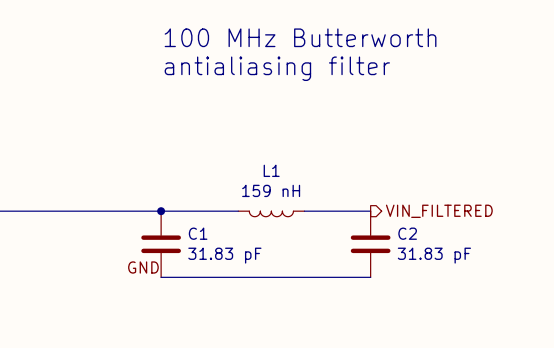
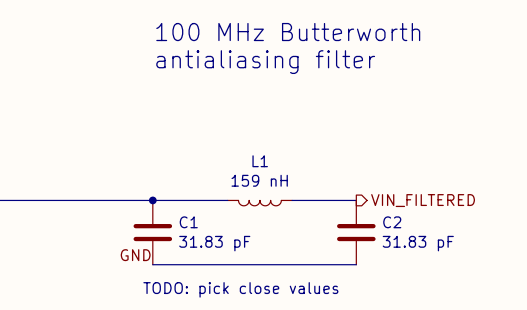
text: none -> TODO: pick close values (240, 289)

